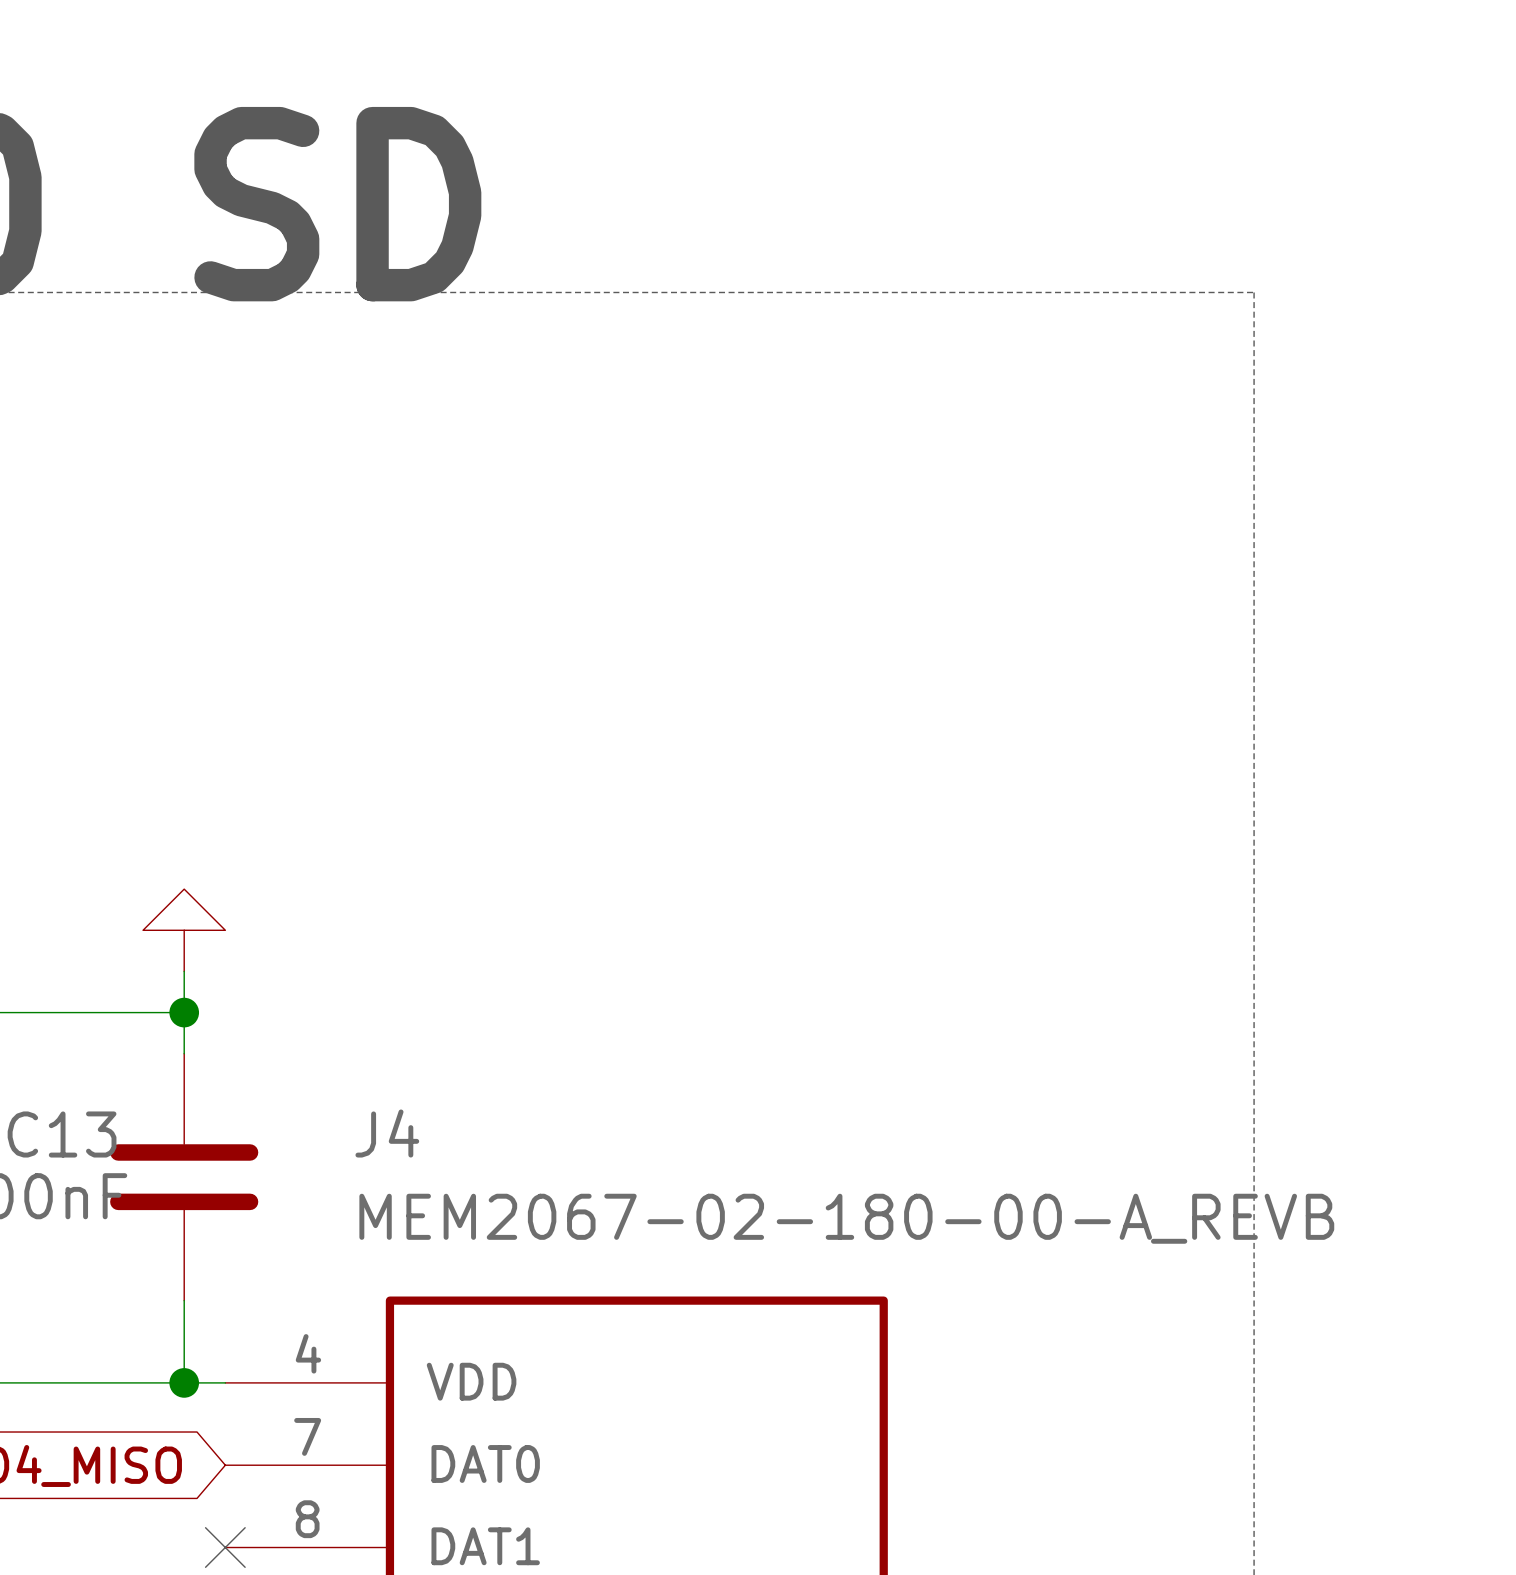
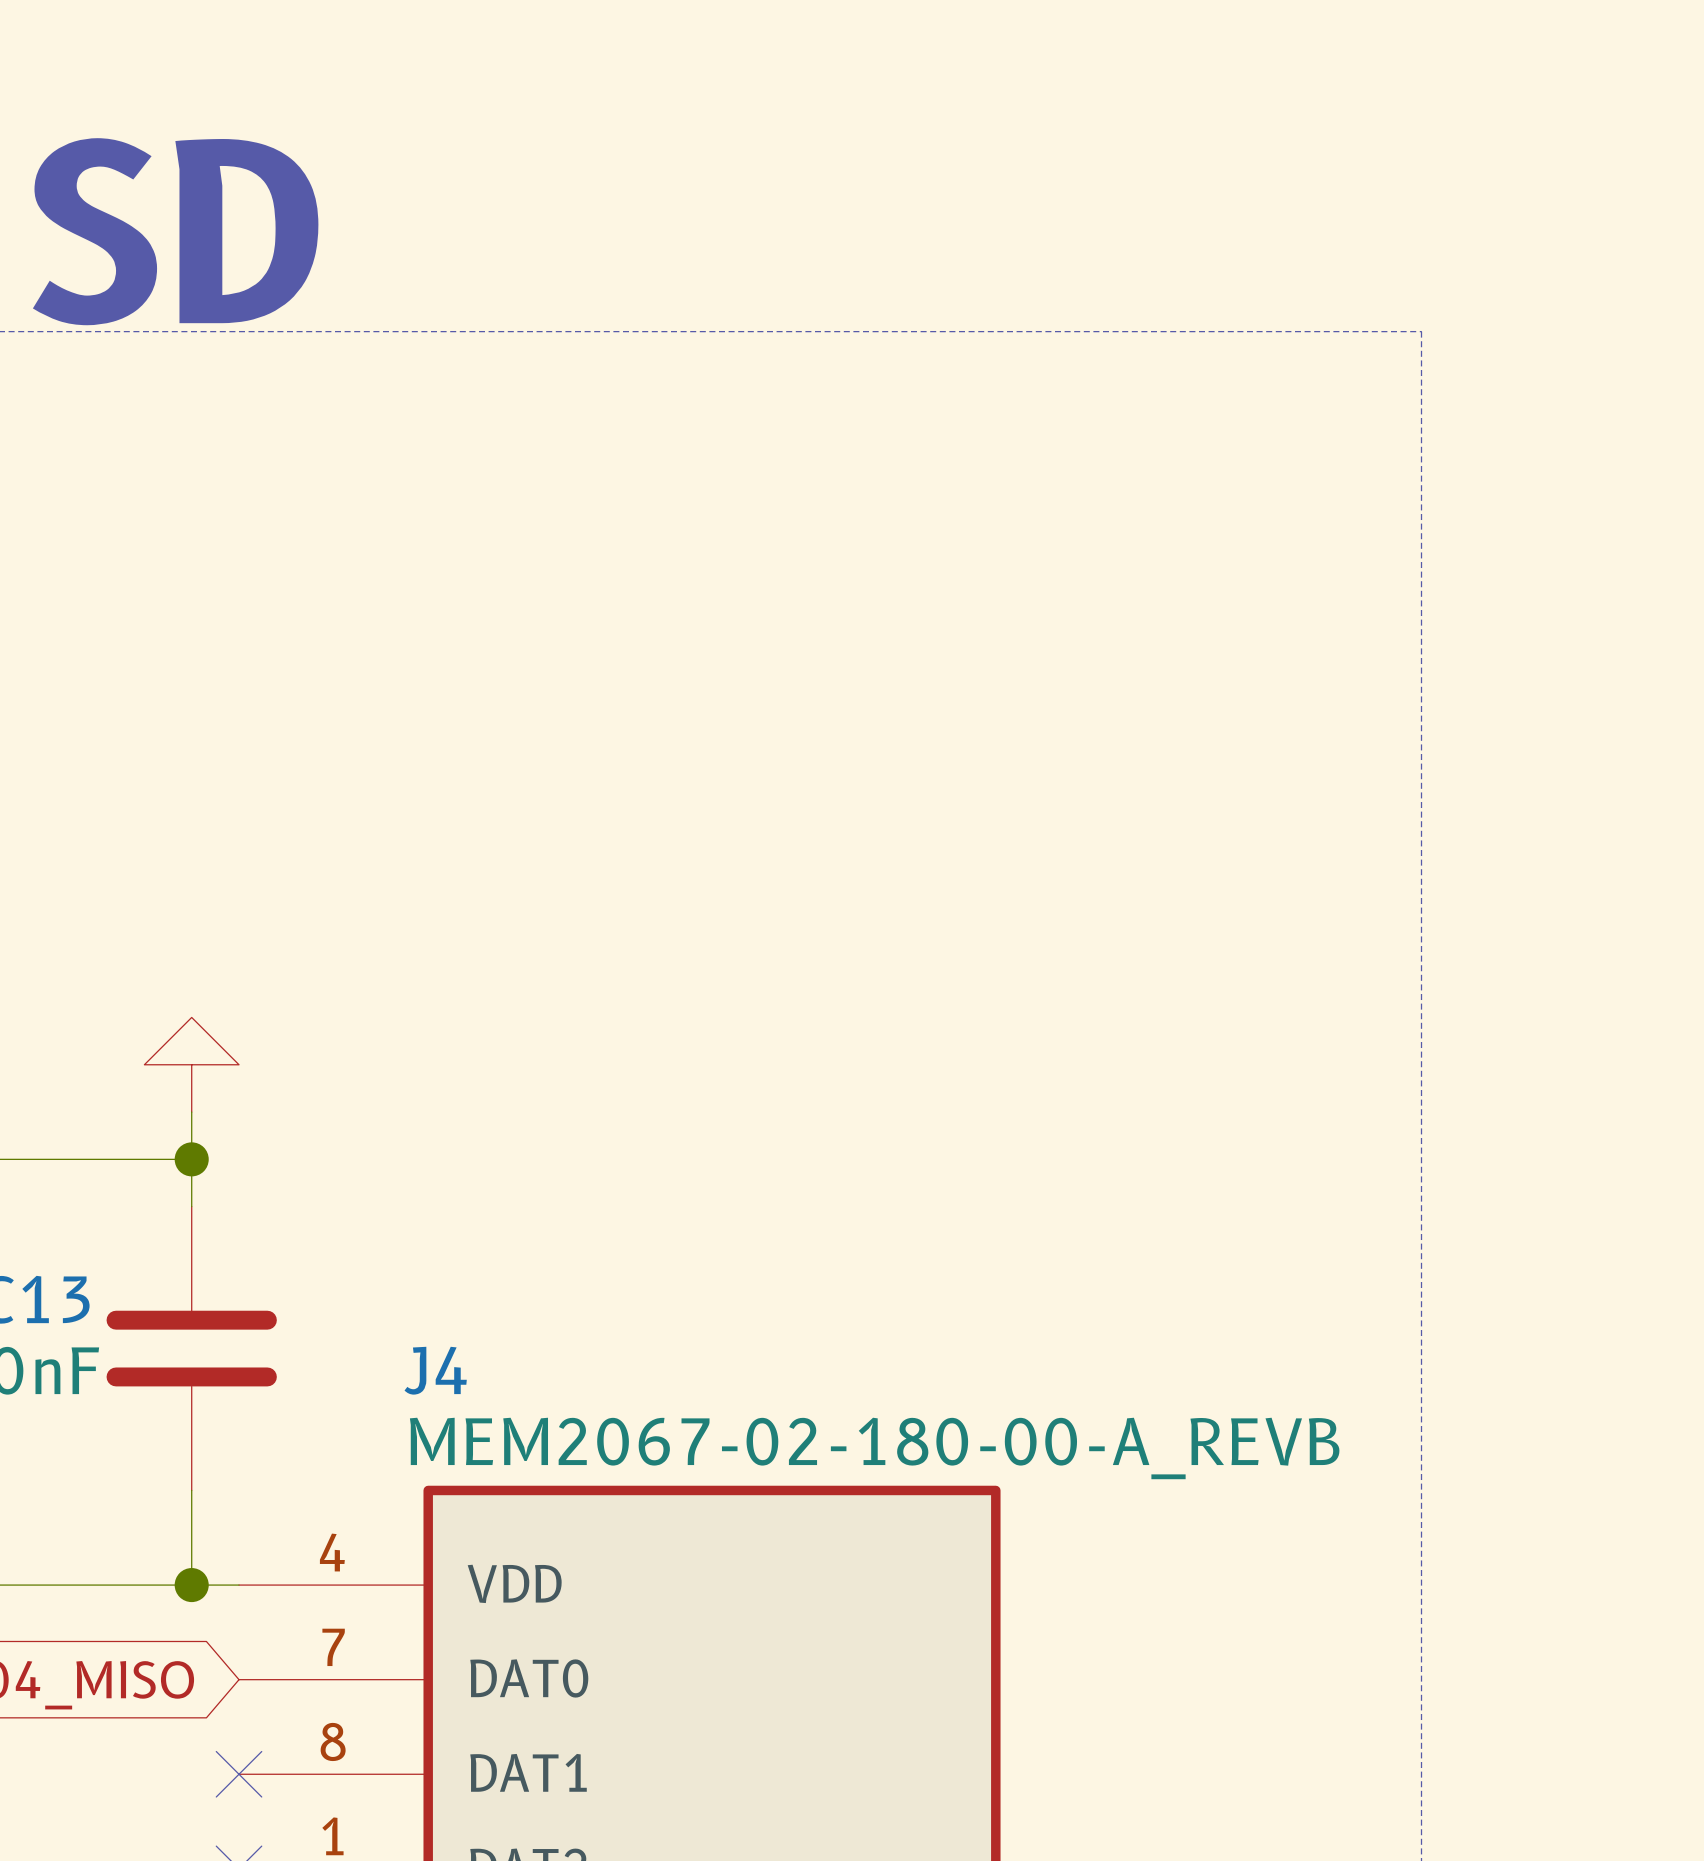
J4 name position: J4 (387, 1133) -> J4 (435, 1370)
J4 value position: MEM2067-02-180-00-A_REVB (846, 1218) -> MEM2067-02-180-00-A_REVB (874, 1448)

